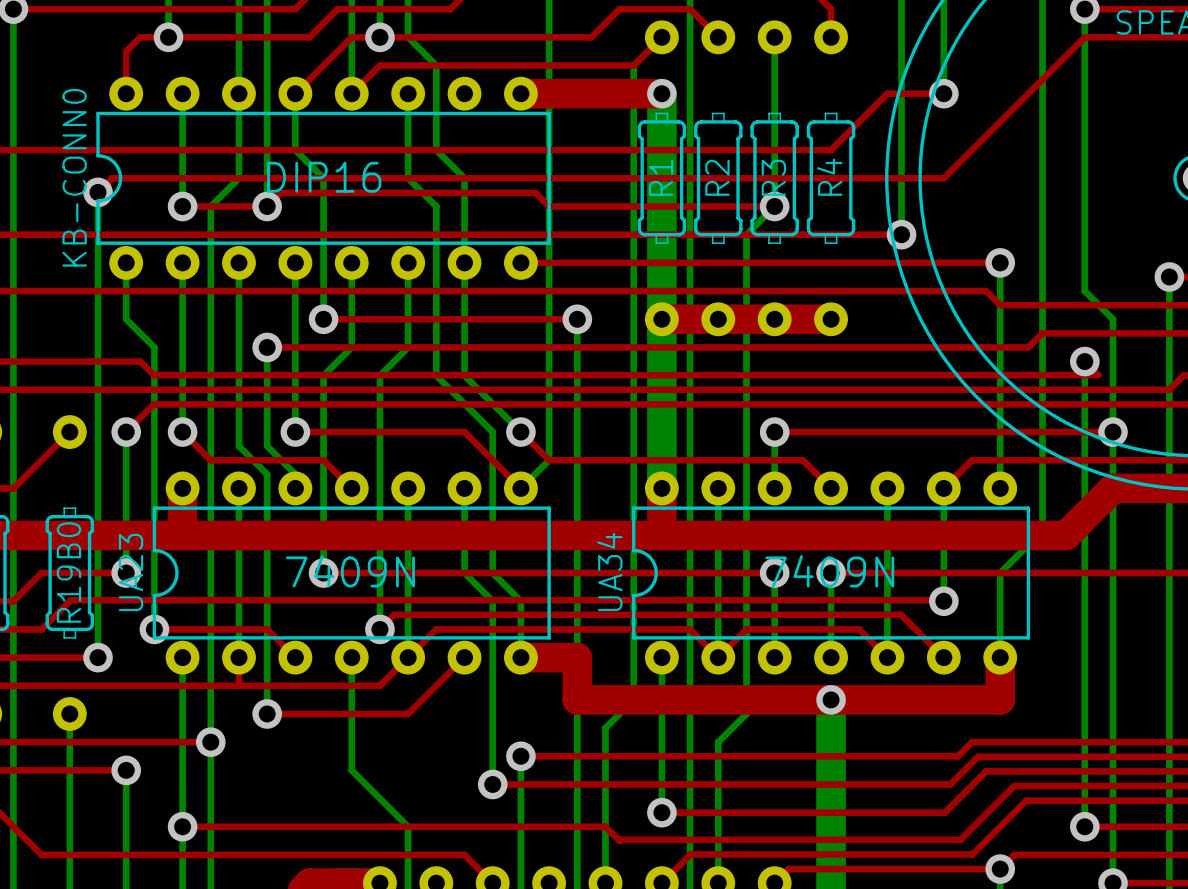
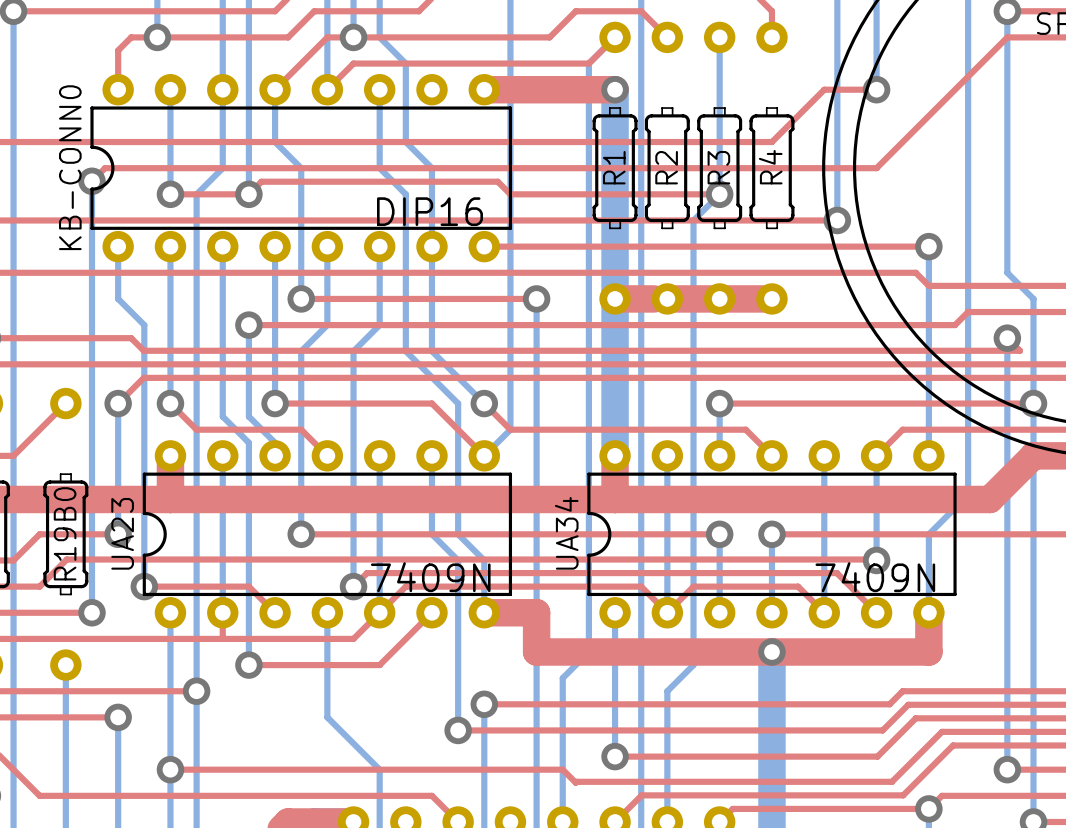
KB-CONN0 value position: DIP16 (324, 177) -> DIP16 (429, 211)
UA23 value position: 7409N (350, 571) -> 7409N (430, 577)
UA34 value position: 7409N (829, 571) -> 7409N (875, 577)

